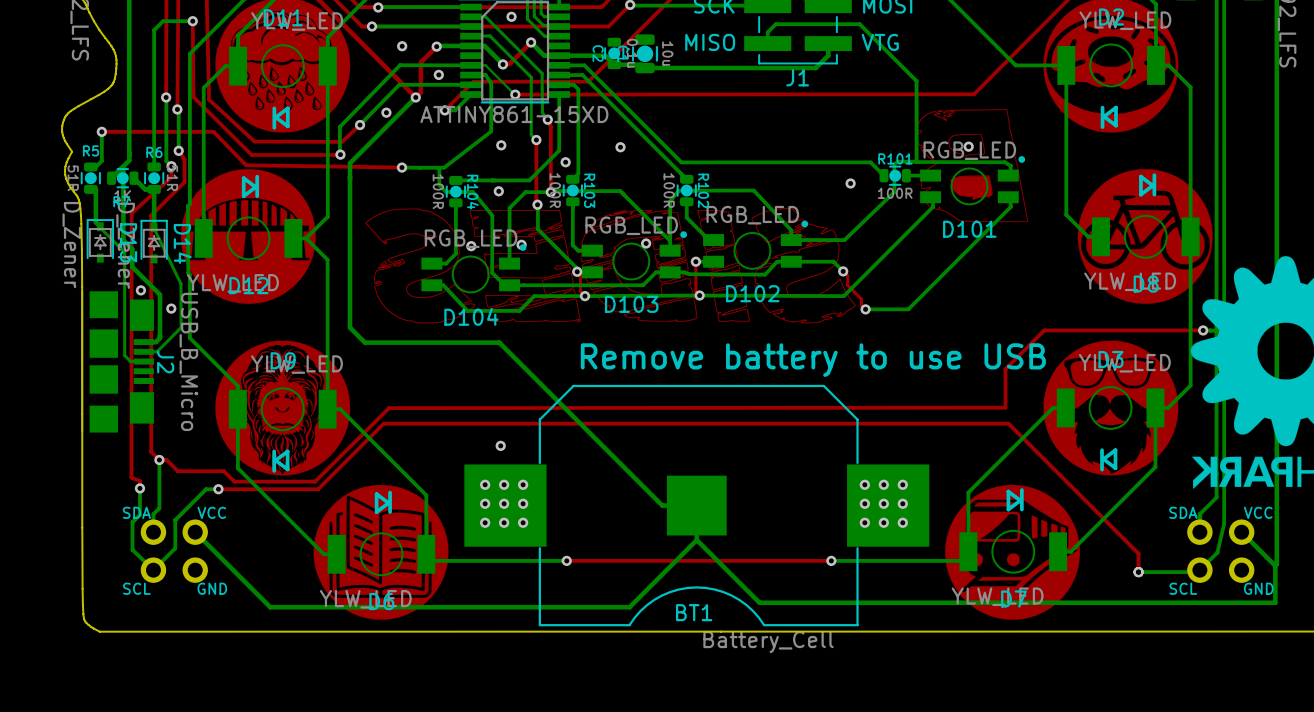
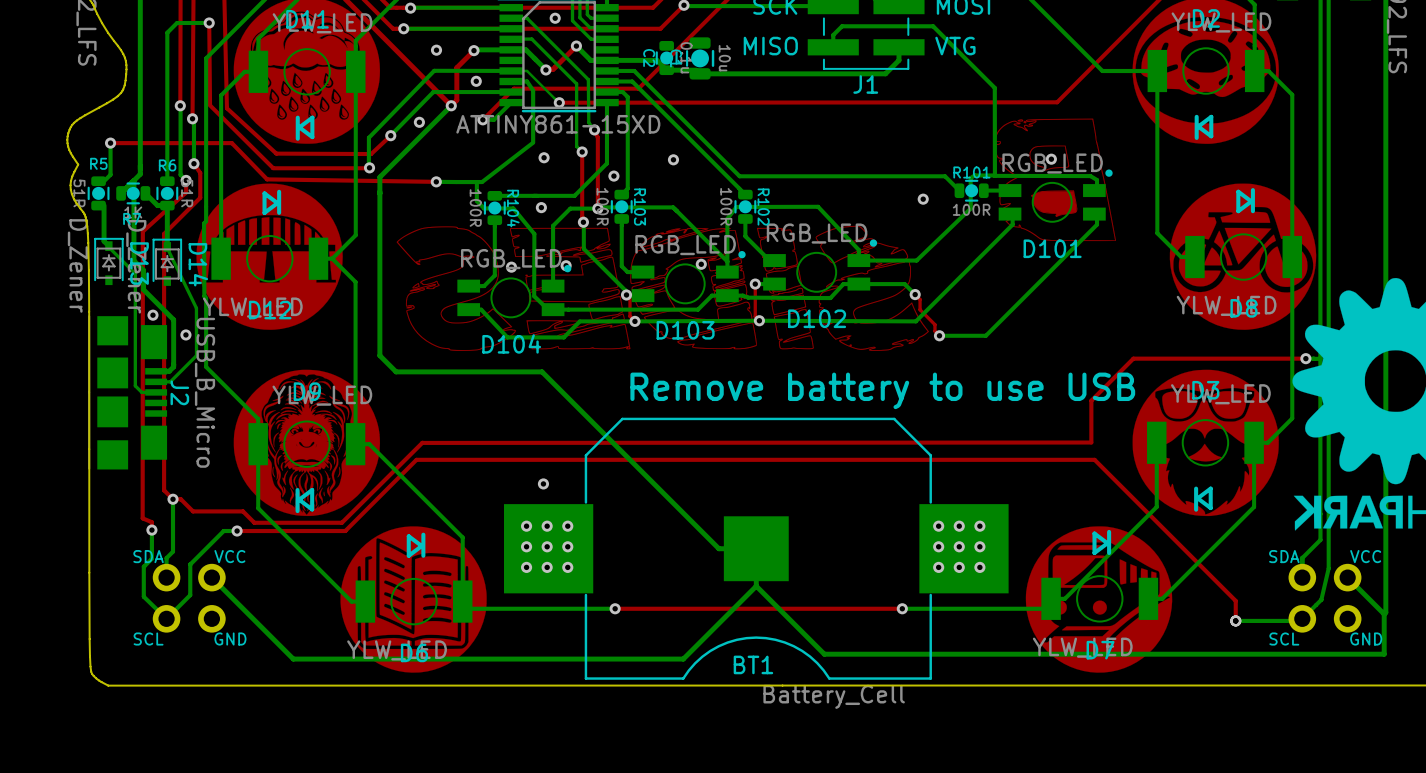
bottom track: (1065, 407) (1053, 407) (968, 492) (968, 551) -> (1156, 442) (1156, 506) (1064, 598) (1051, 598)

